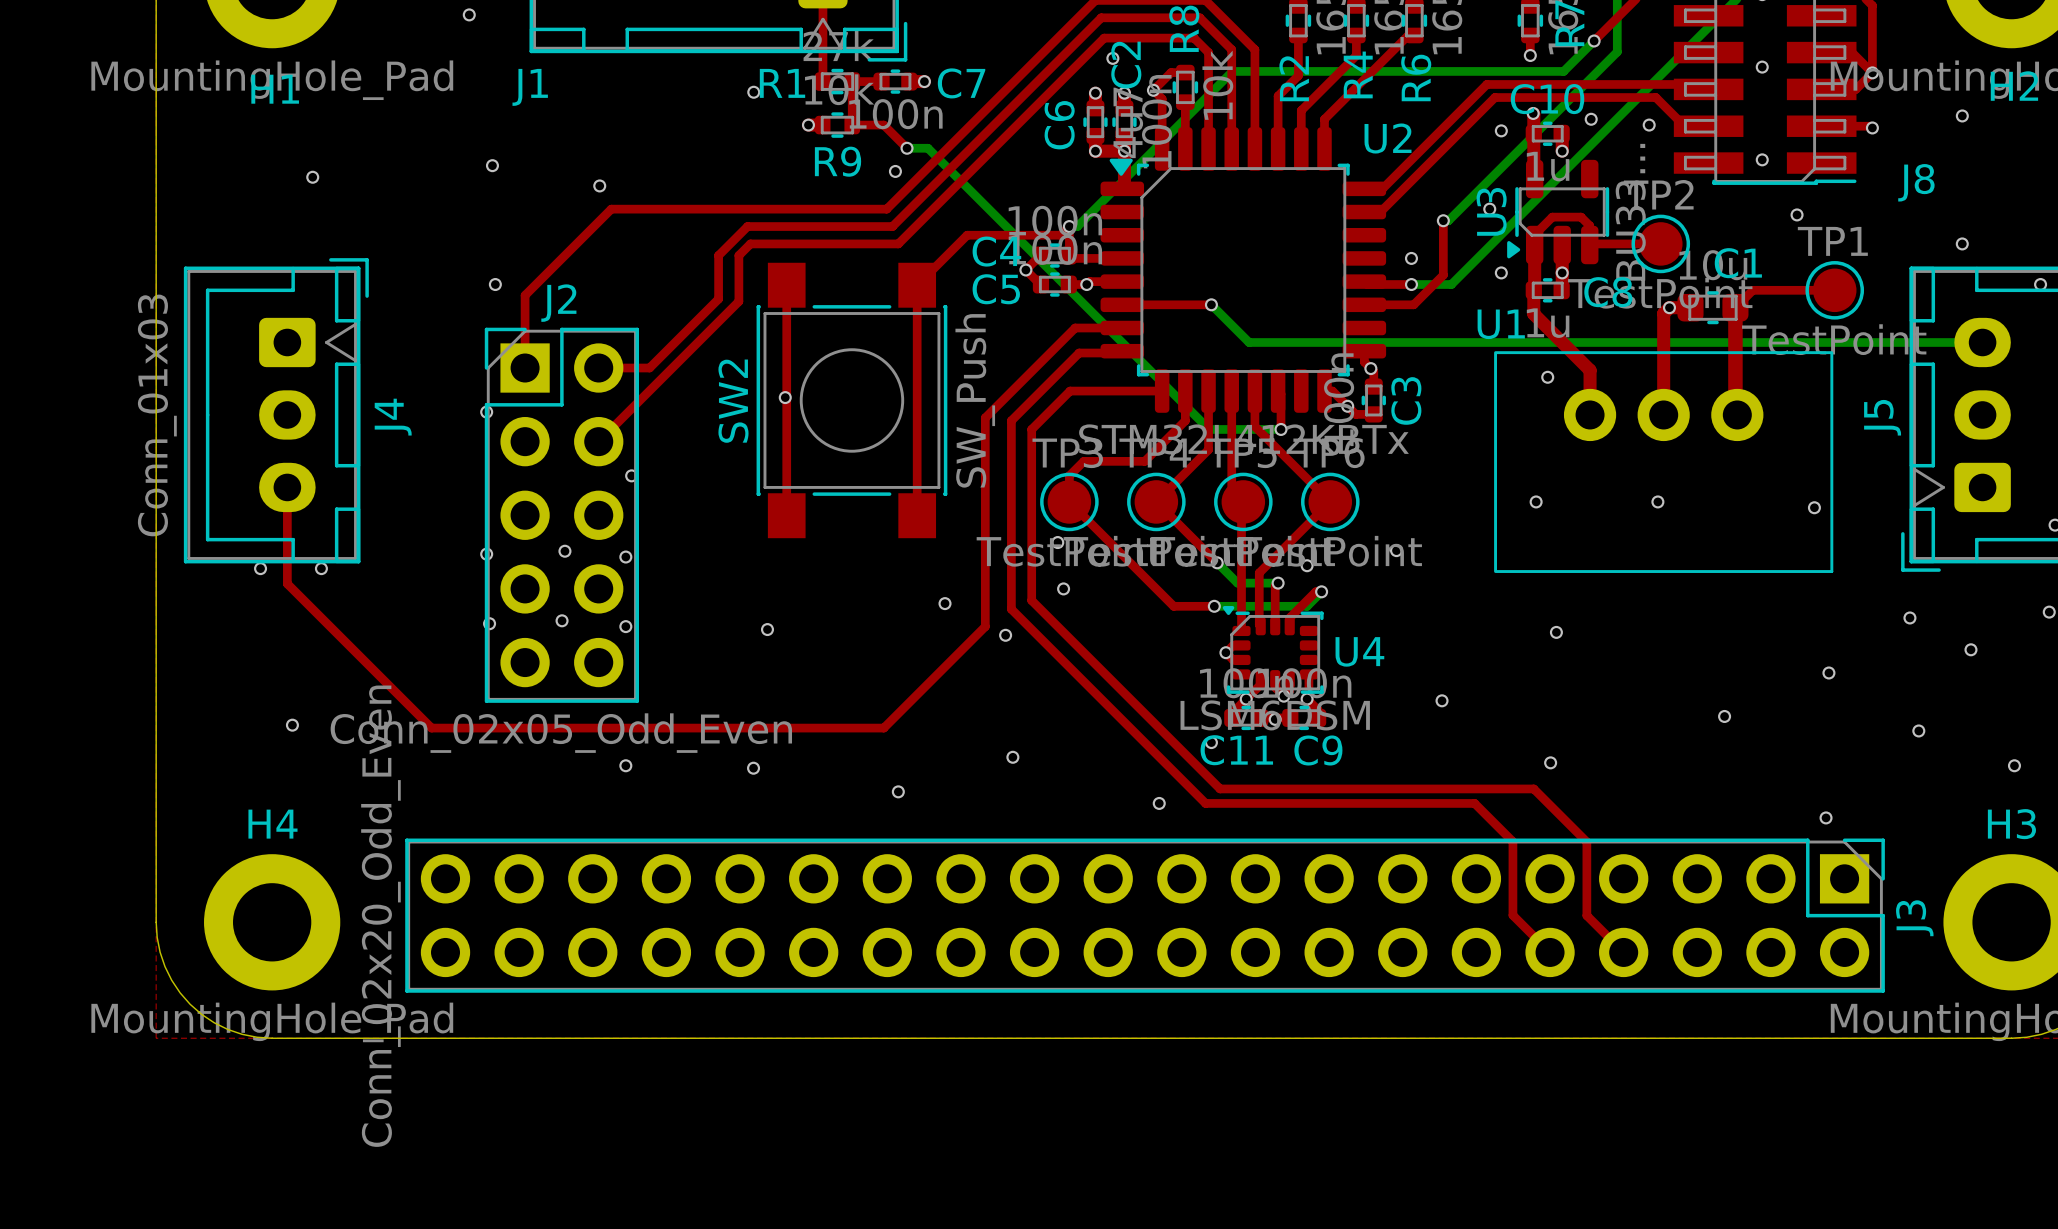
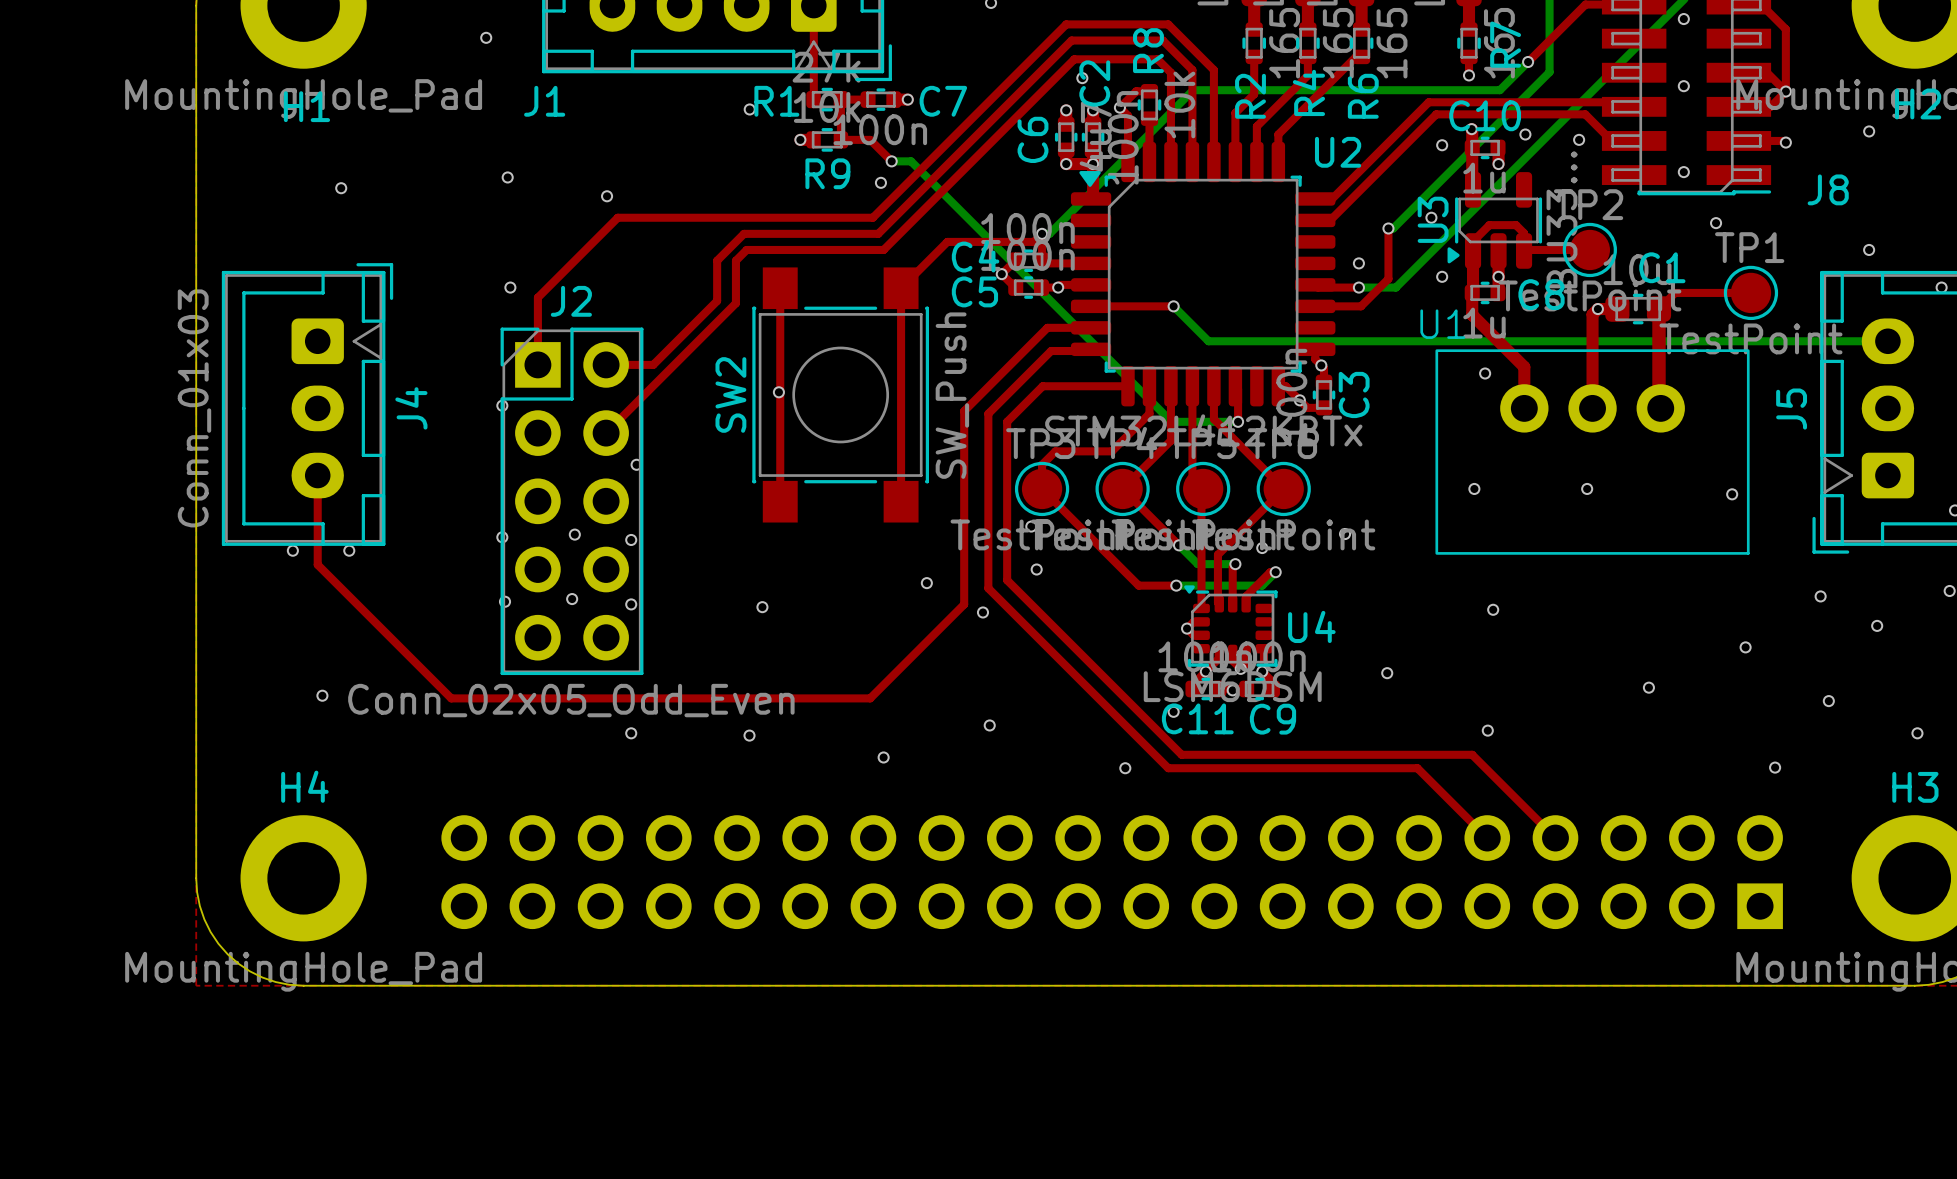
via position: (1826, 817) -> (1775, 767)
top track: (1512, 841) (1512, 915) (1550, 952) -> (1452, 803) (1487, 838)
top track: (1586, 842) (1586, 915) (1623, 952) -> (1521, 803) (1555, 838)
J3 side: top (1145, 915) -> bottom (1112, 872)

